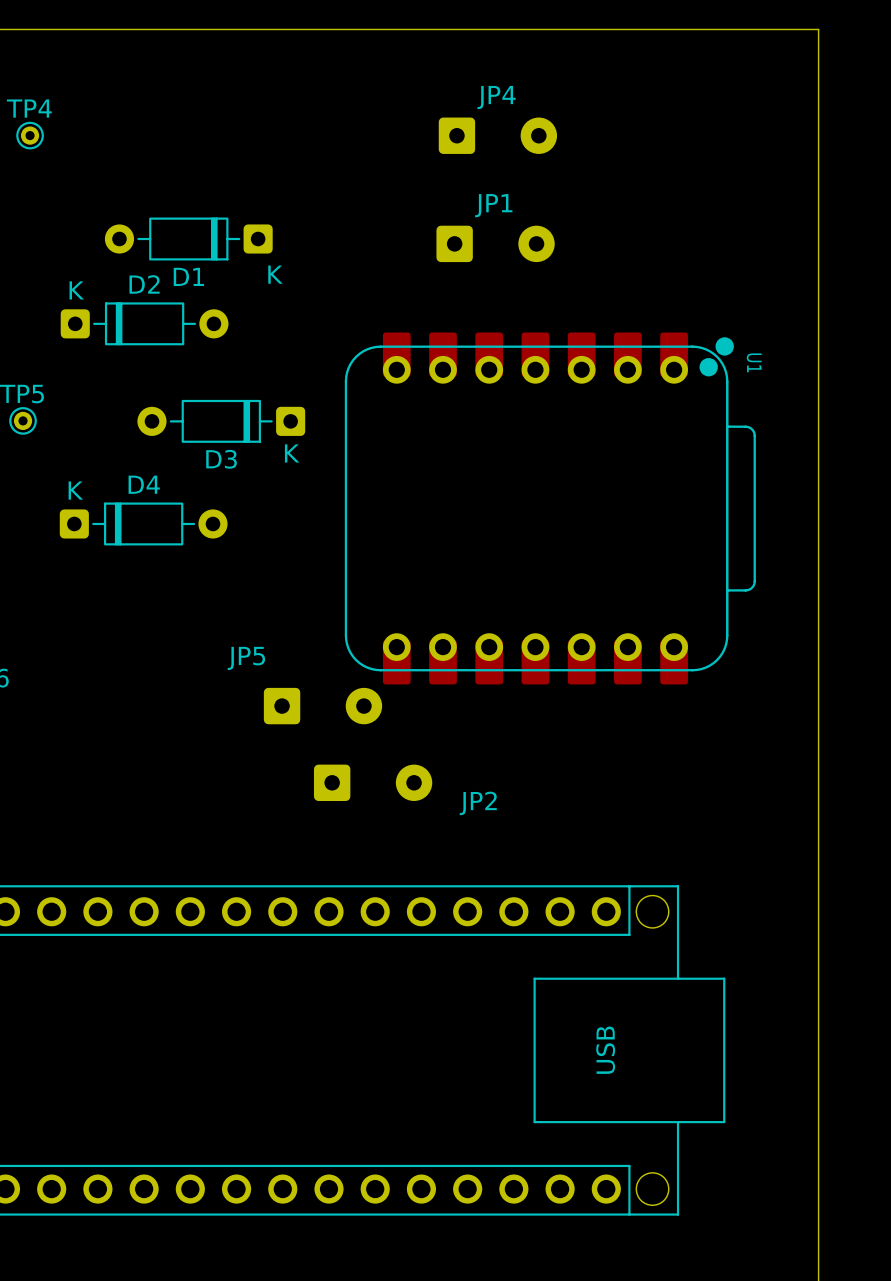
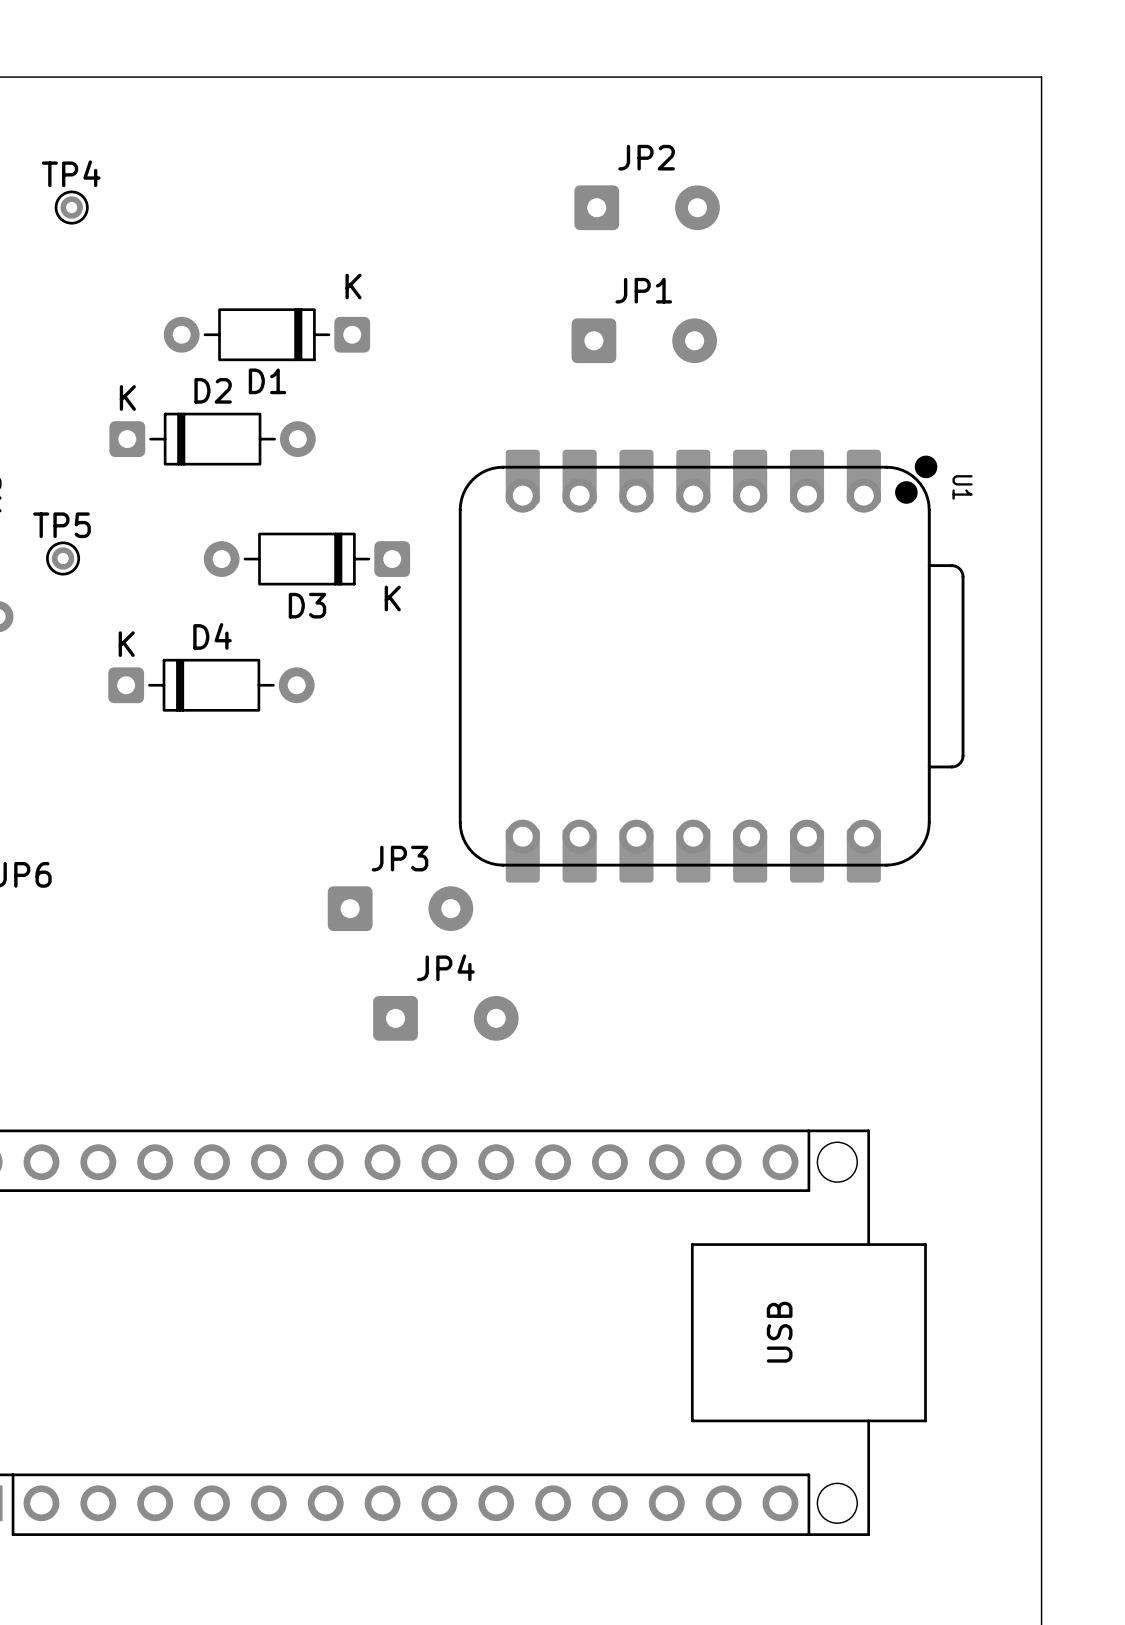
JP4 name: JP4 (496, 97) -> JP2 (646, 157)
D1 text position: K (275, 274) -> K (353, 286)
JP3: none -> (400, 908)
JP5: (322, 706) -> none
JP2: (373, 782) -> none
JP4: none -> (445, 1018)

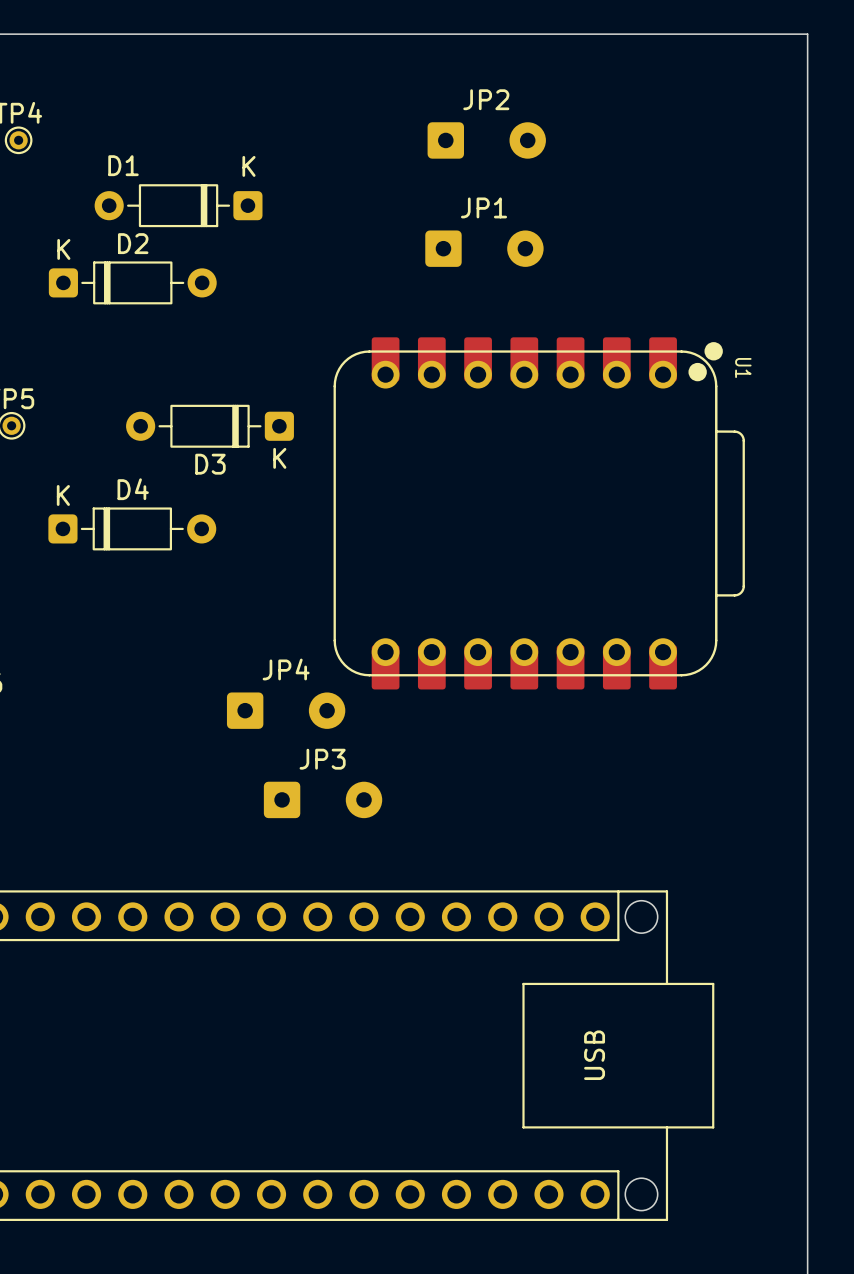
D1 position: (266, 334) -> (178, 205)
D1 name position: D1 (267, 381) -> D1 (123, 165)
D2 position: (212, 439) -> (132, 282)
JP3 name: JP3 (399, 858) -> JP4 (286, 669)
JP4 name: JP4 (445, 967) -> JP3 (322, 759)

